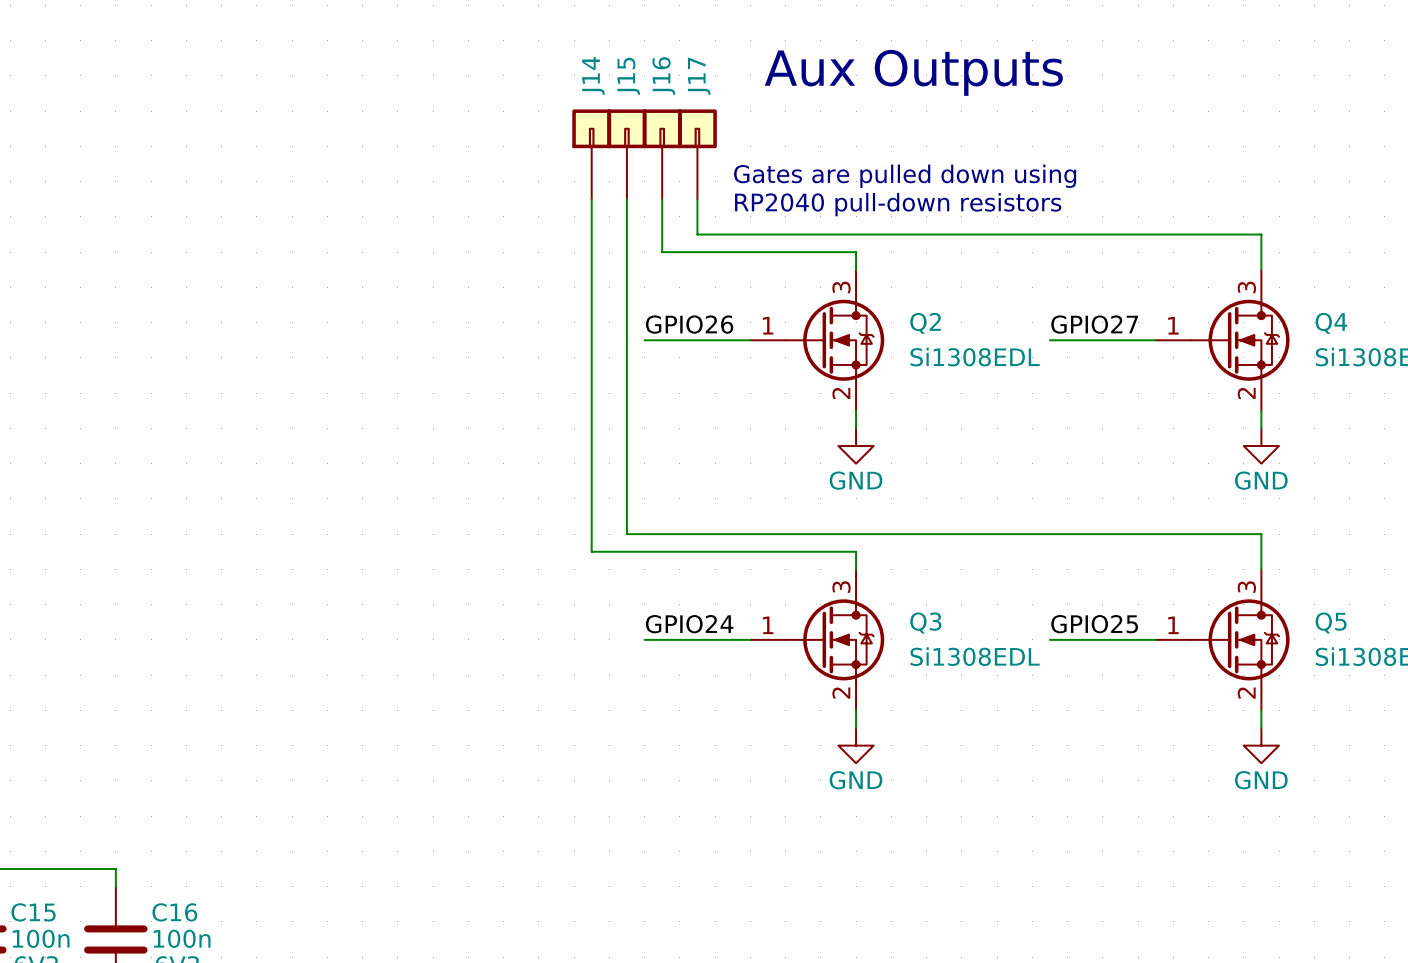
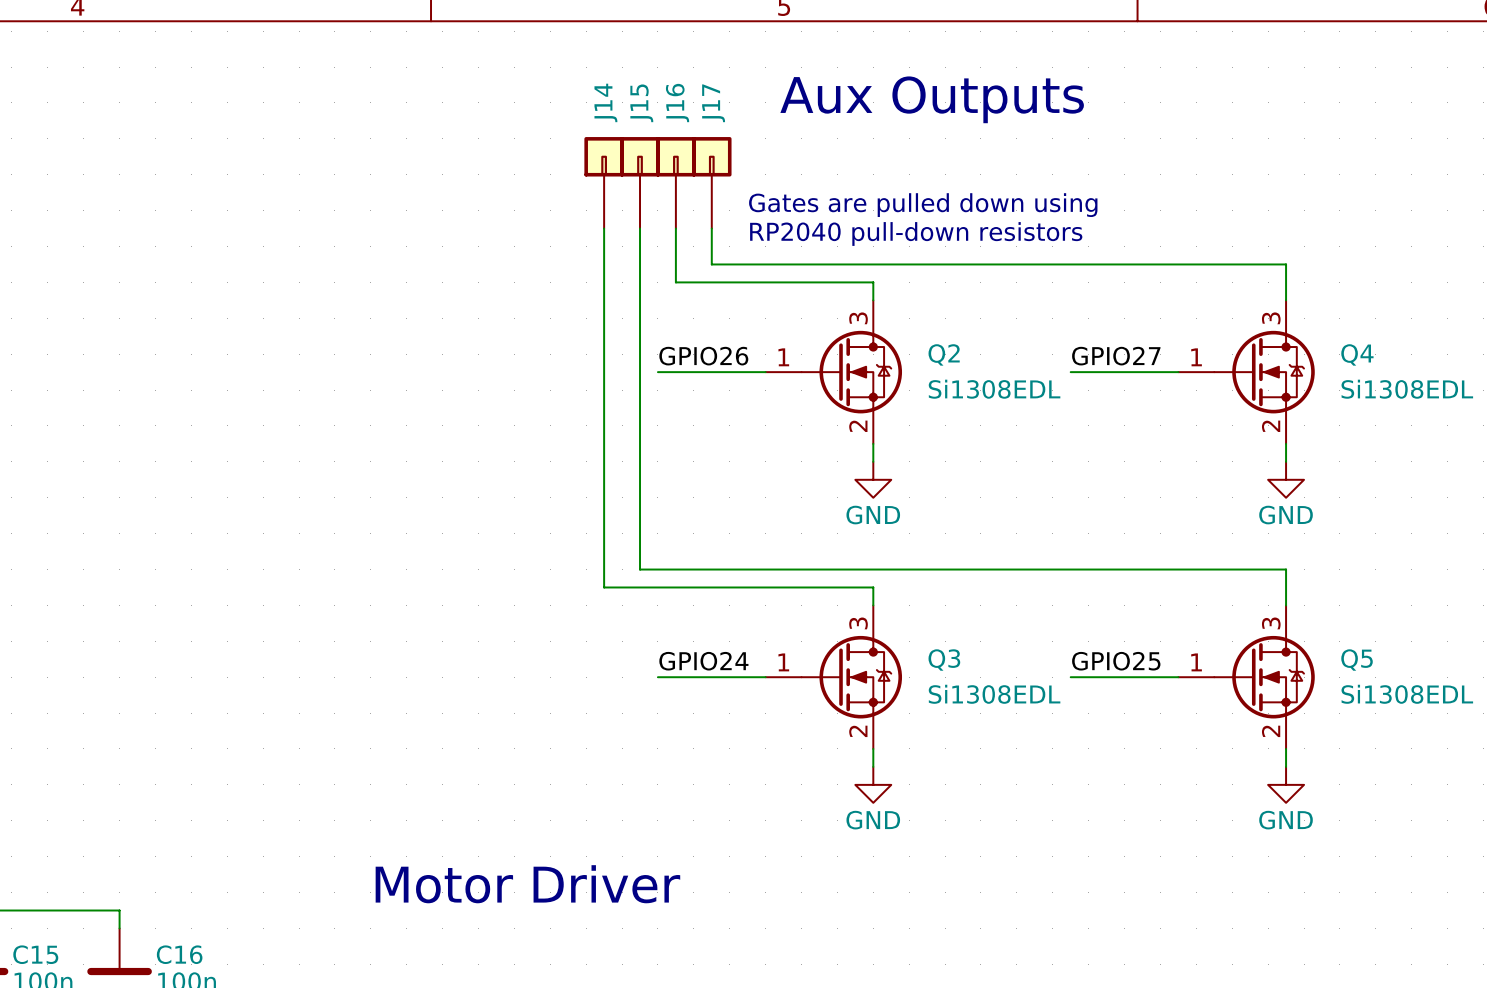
text: none -> Motor Driver (527, 884)

